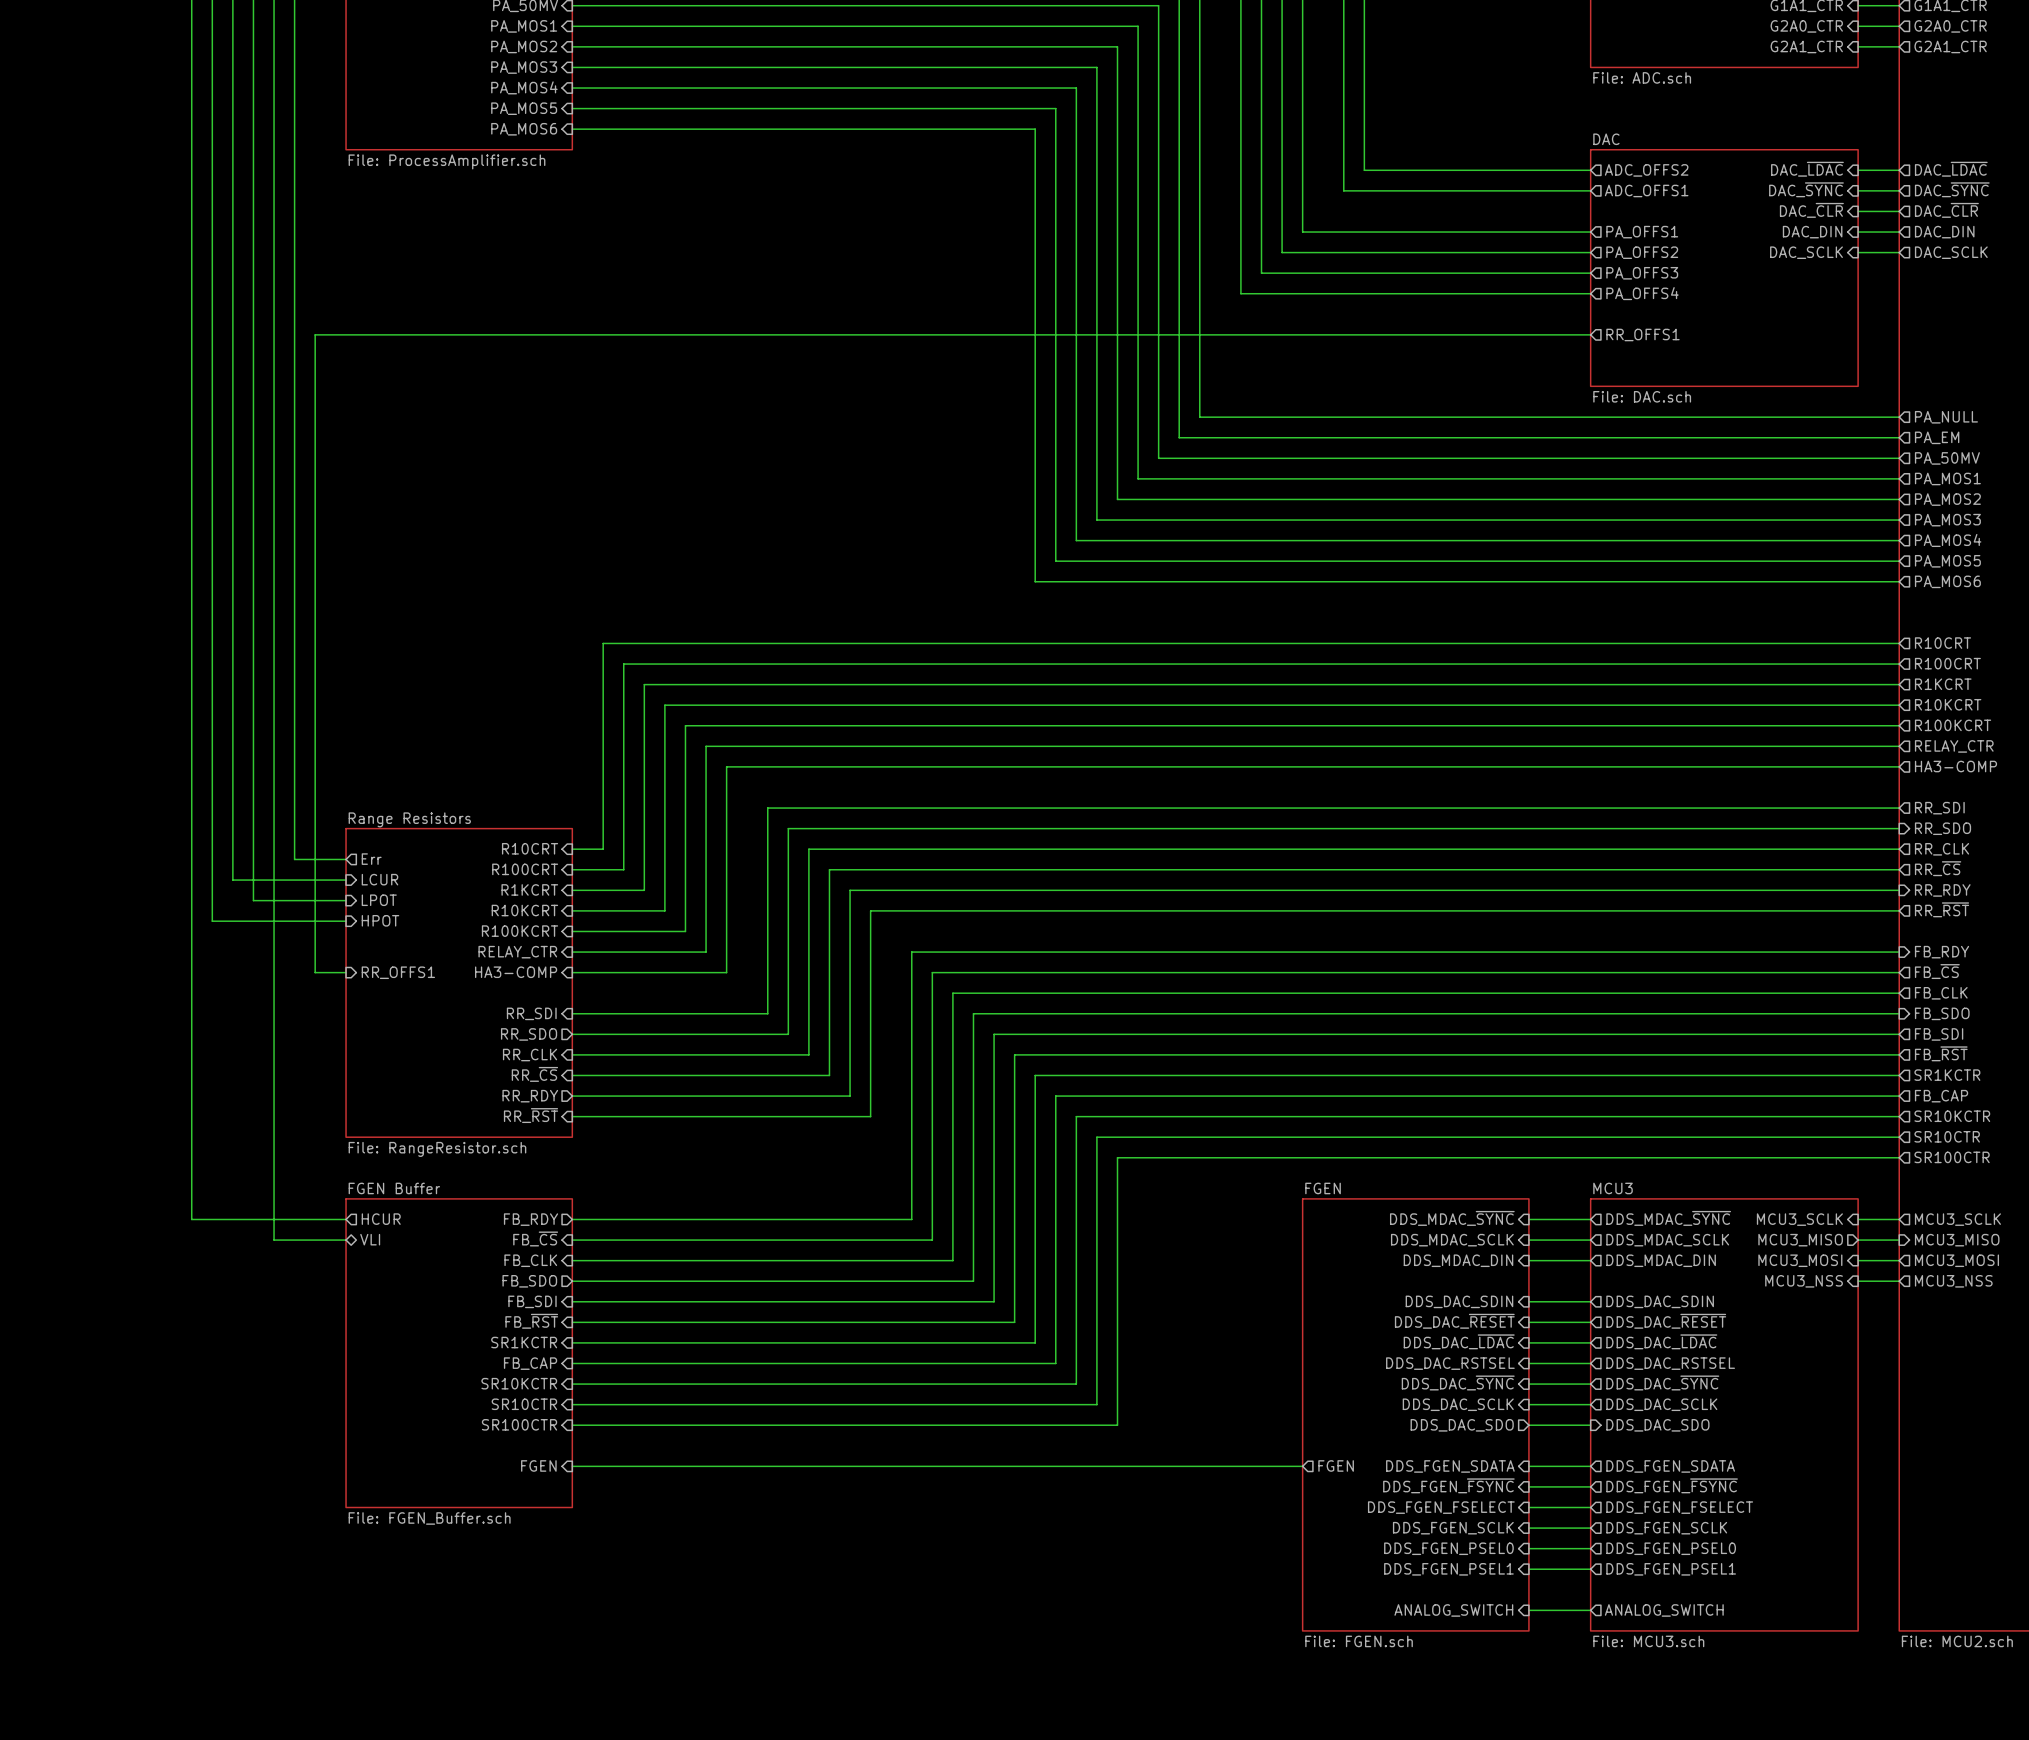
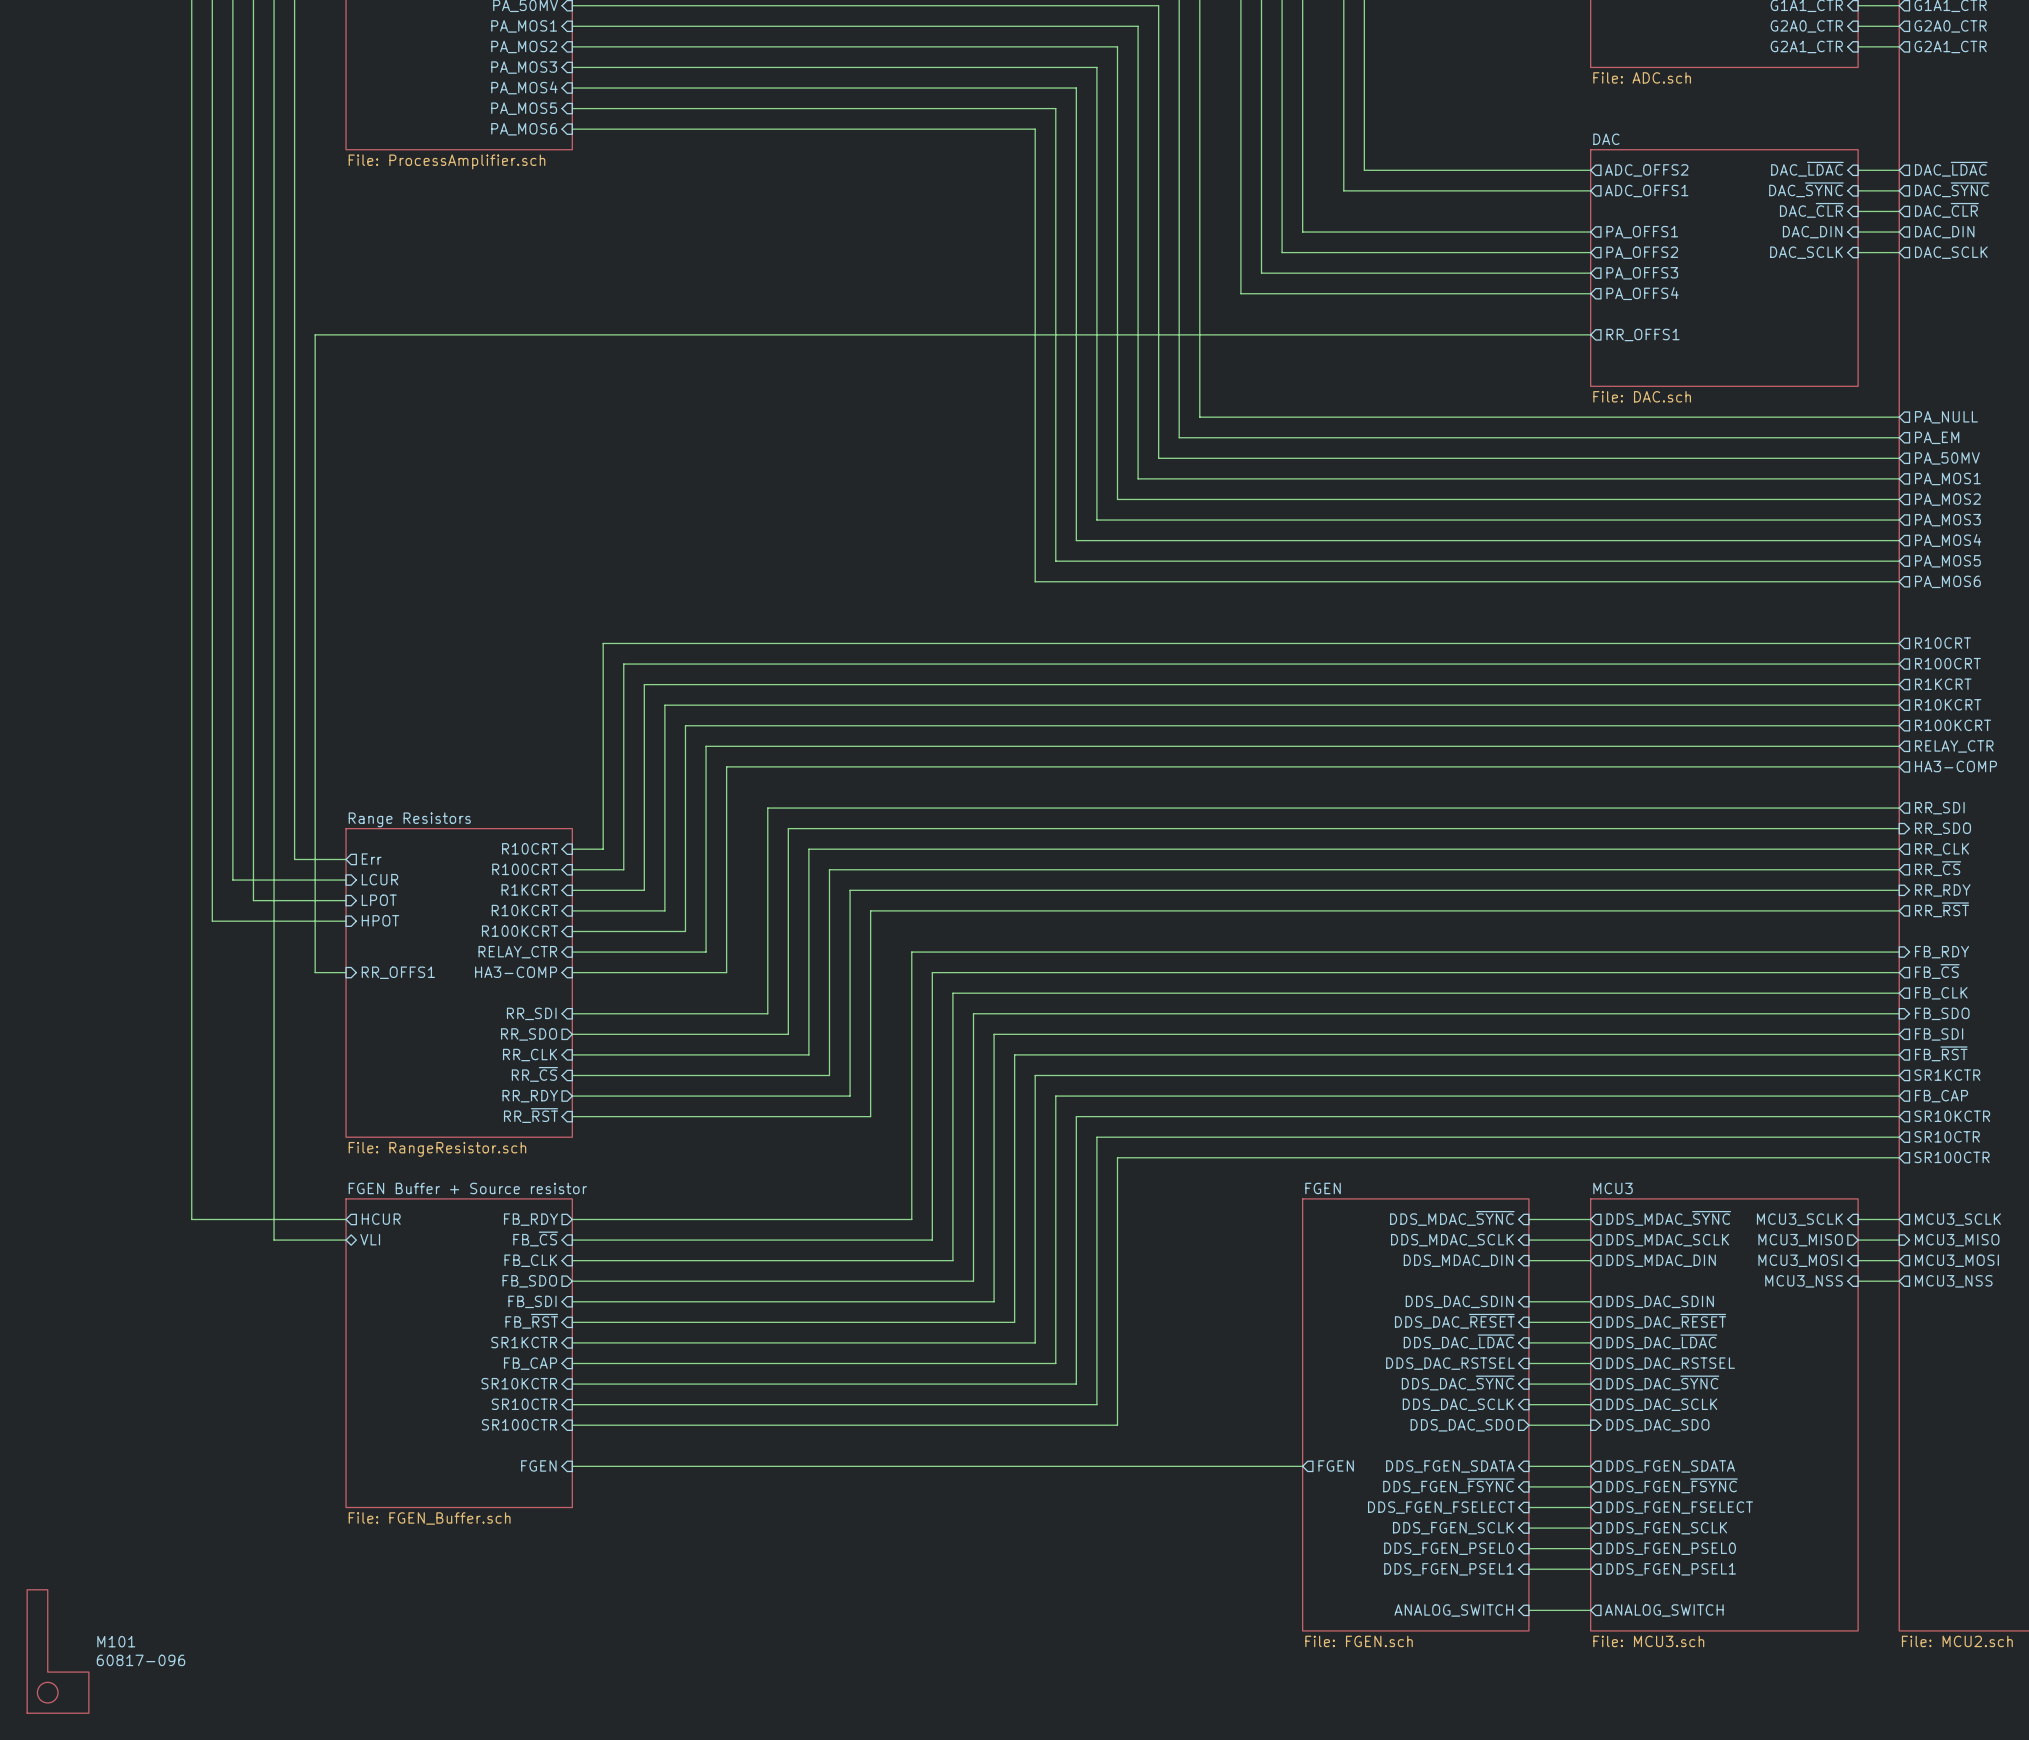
sheet FGEN Buffer name: FGEN Buffer (394, 1188) -> FGEN Buffer + Source resistor (467, 1188)
M101: none -> 60817-096 (58, 1651)

